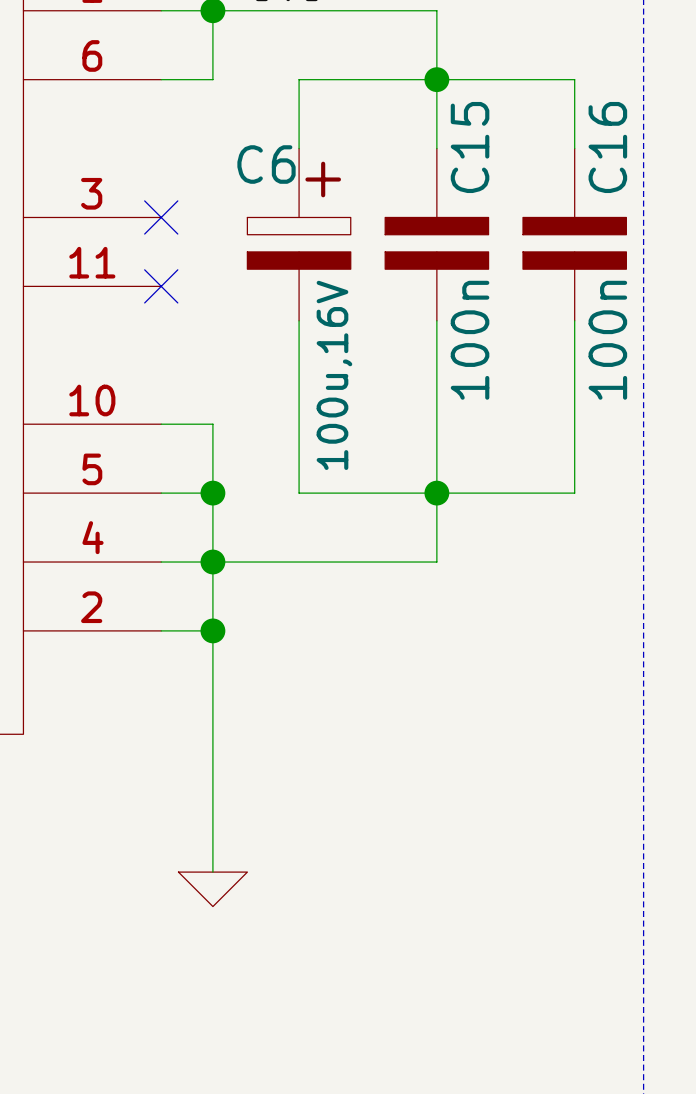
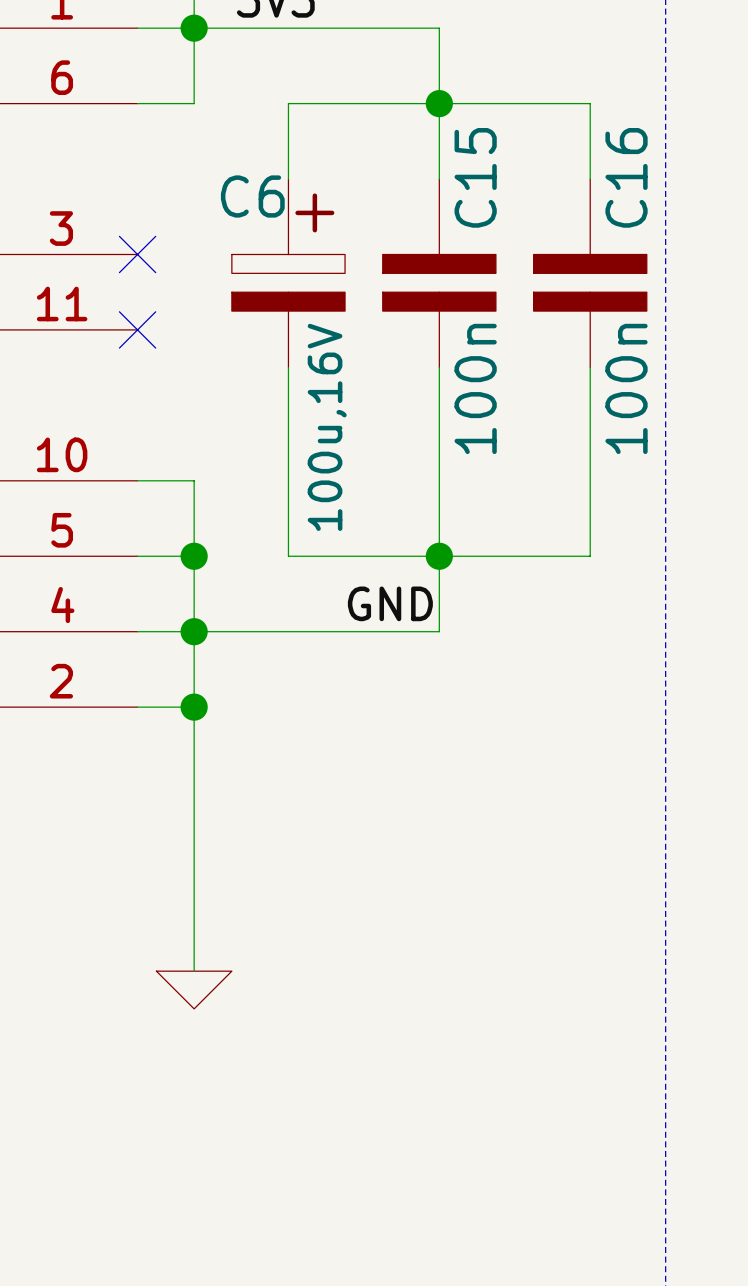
label: none -> GND (390, 603)

